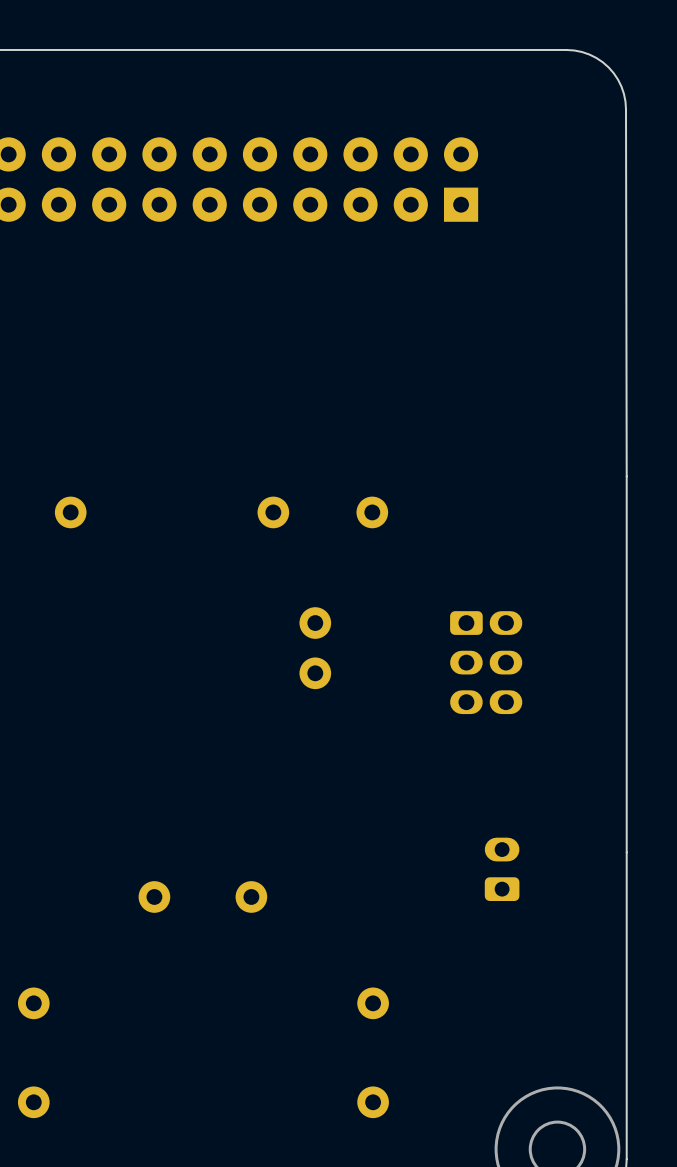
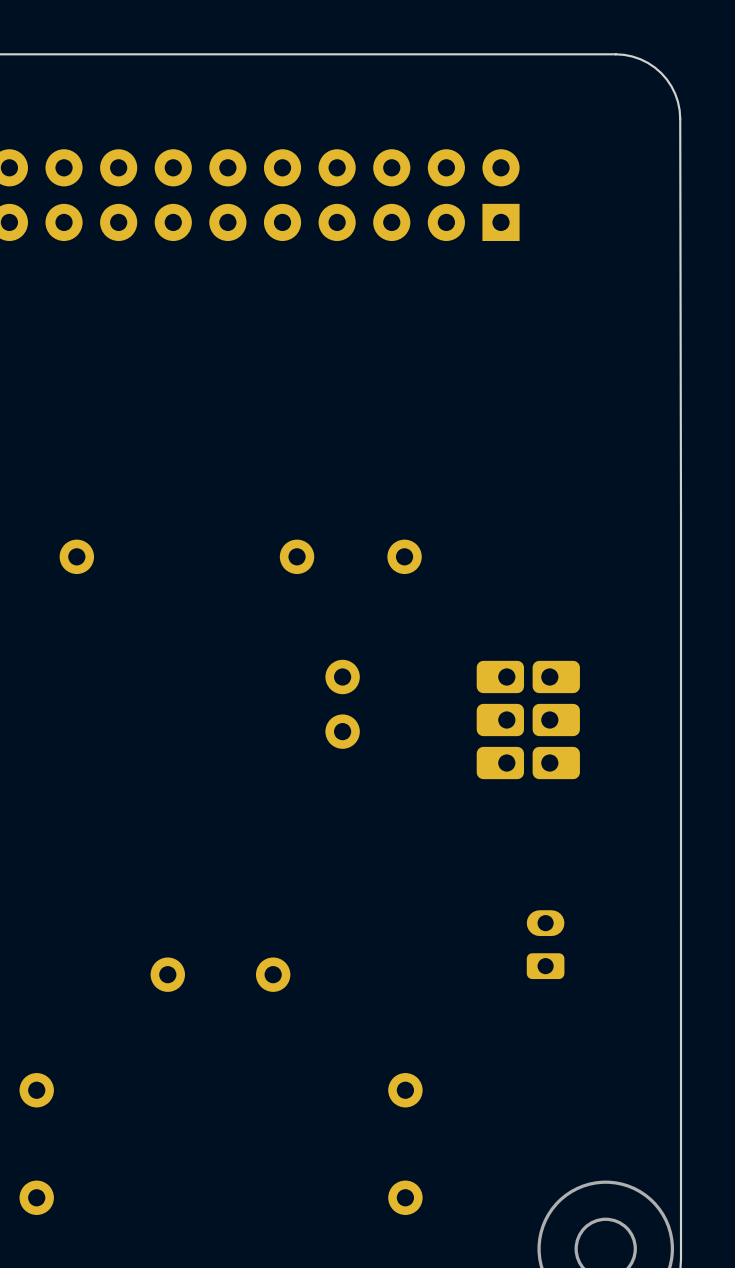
part footprint: [450, 611, 523, 715] -> [476, 660, 580, 780]

